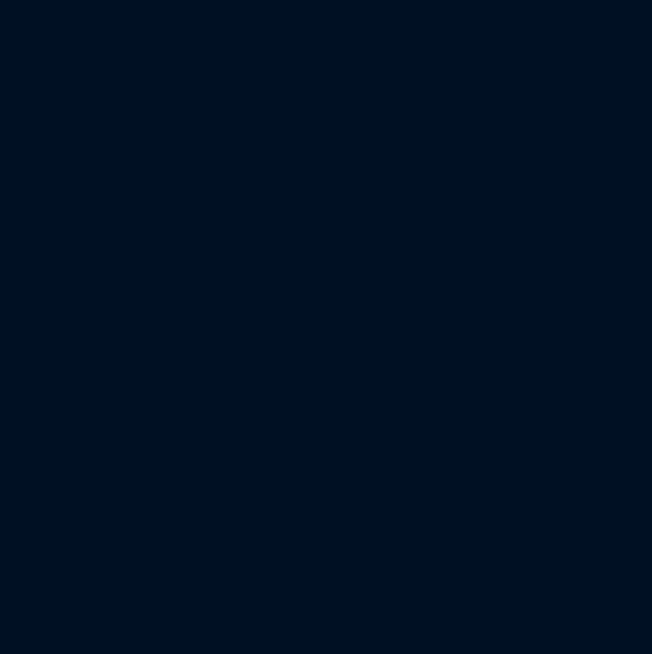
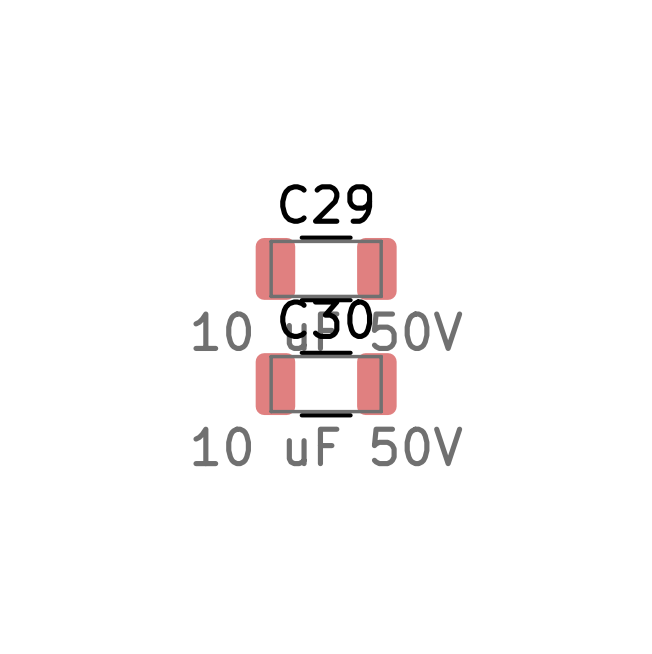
C29: none -> 10 uF 50V (326, 268)
C30: none -> 10 uF 50V (326, 384)

